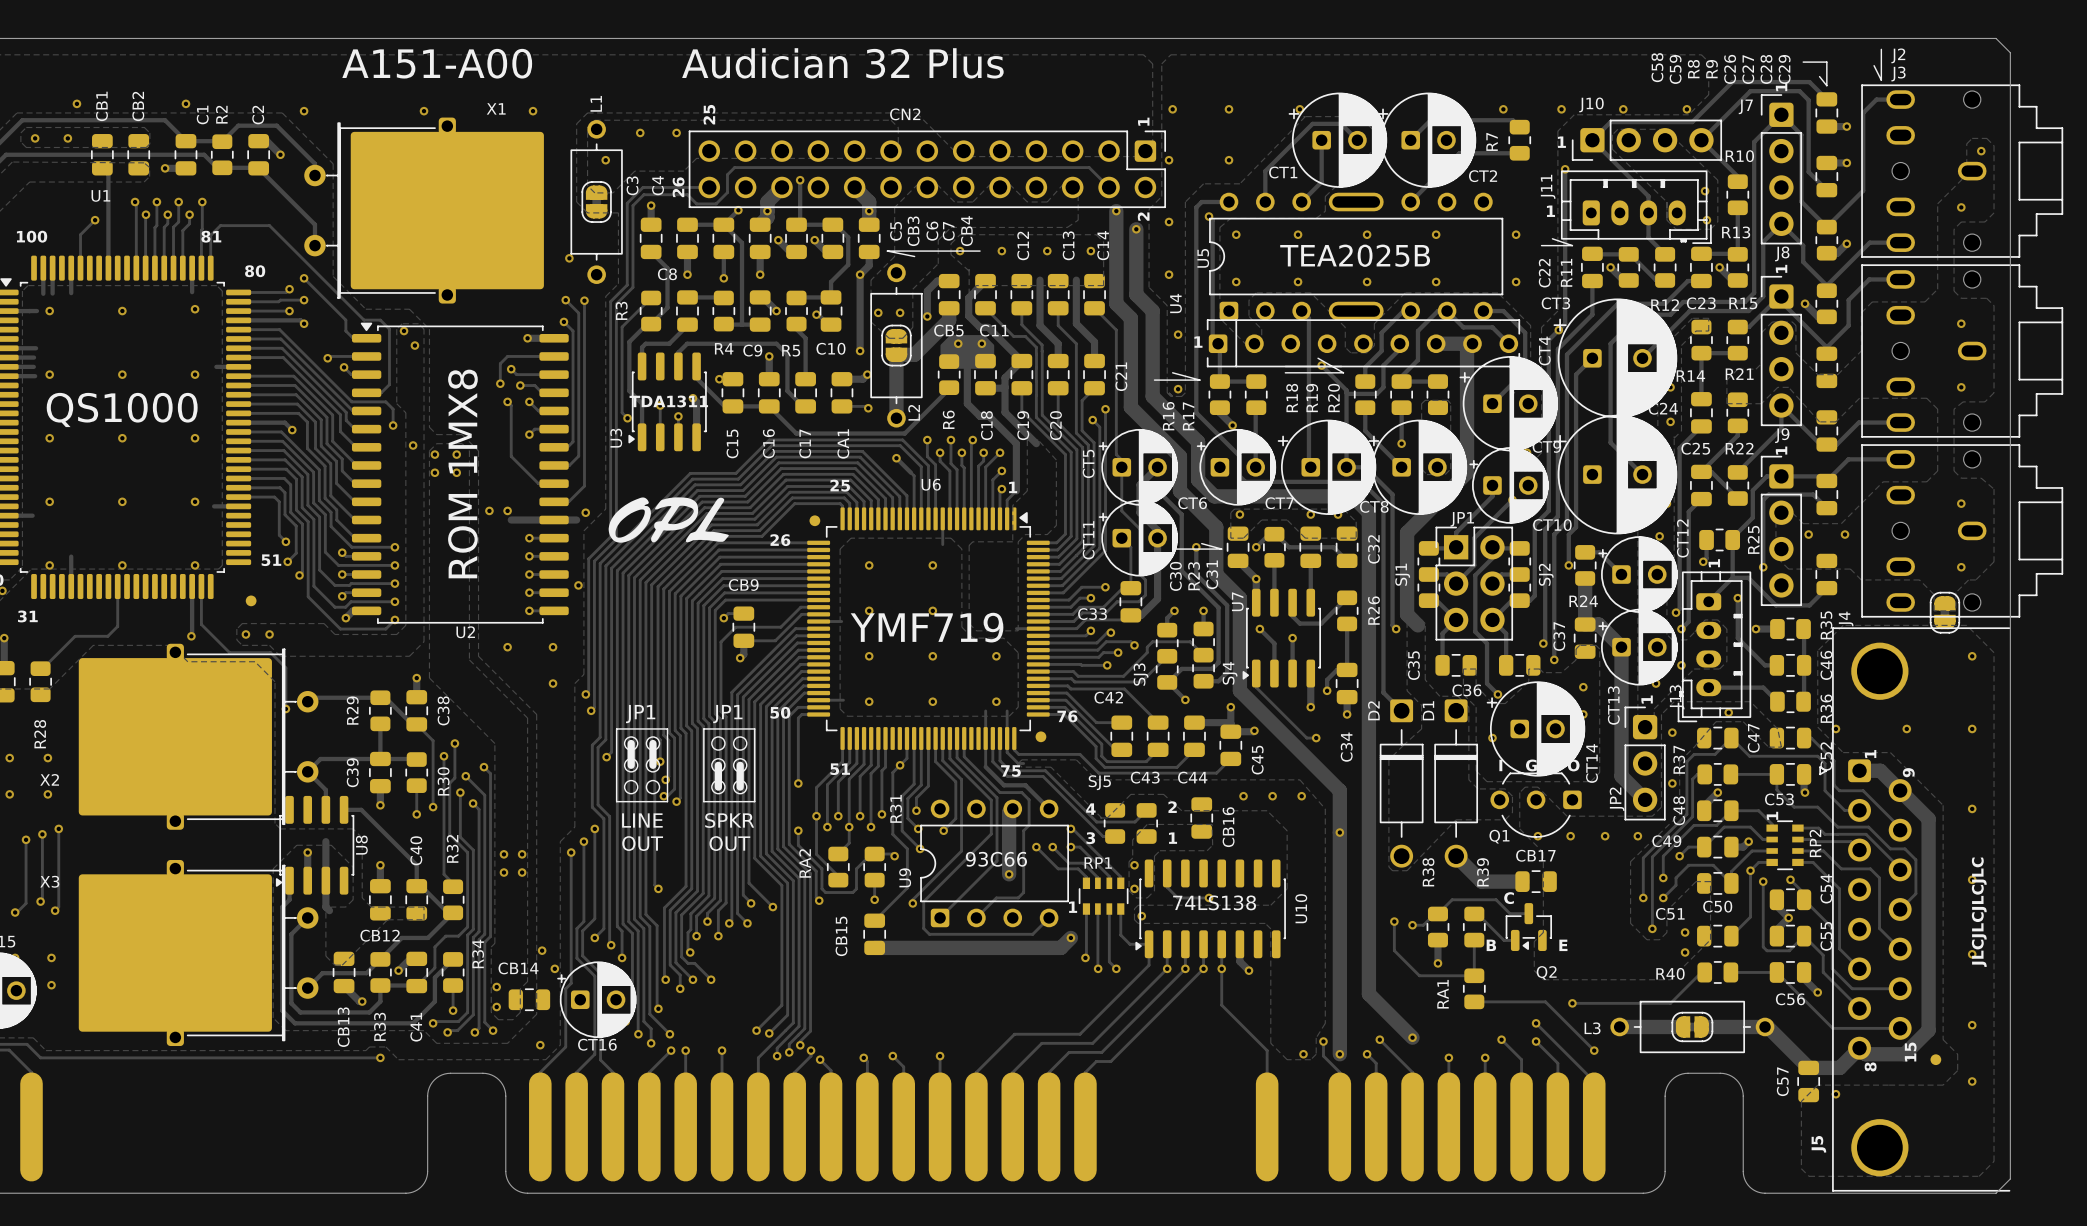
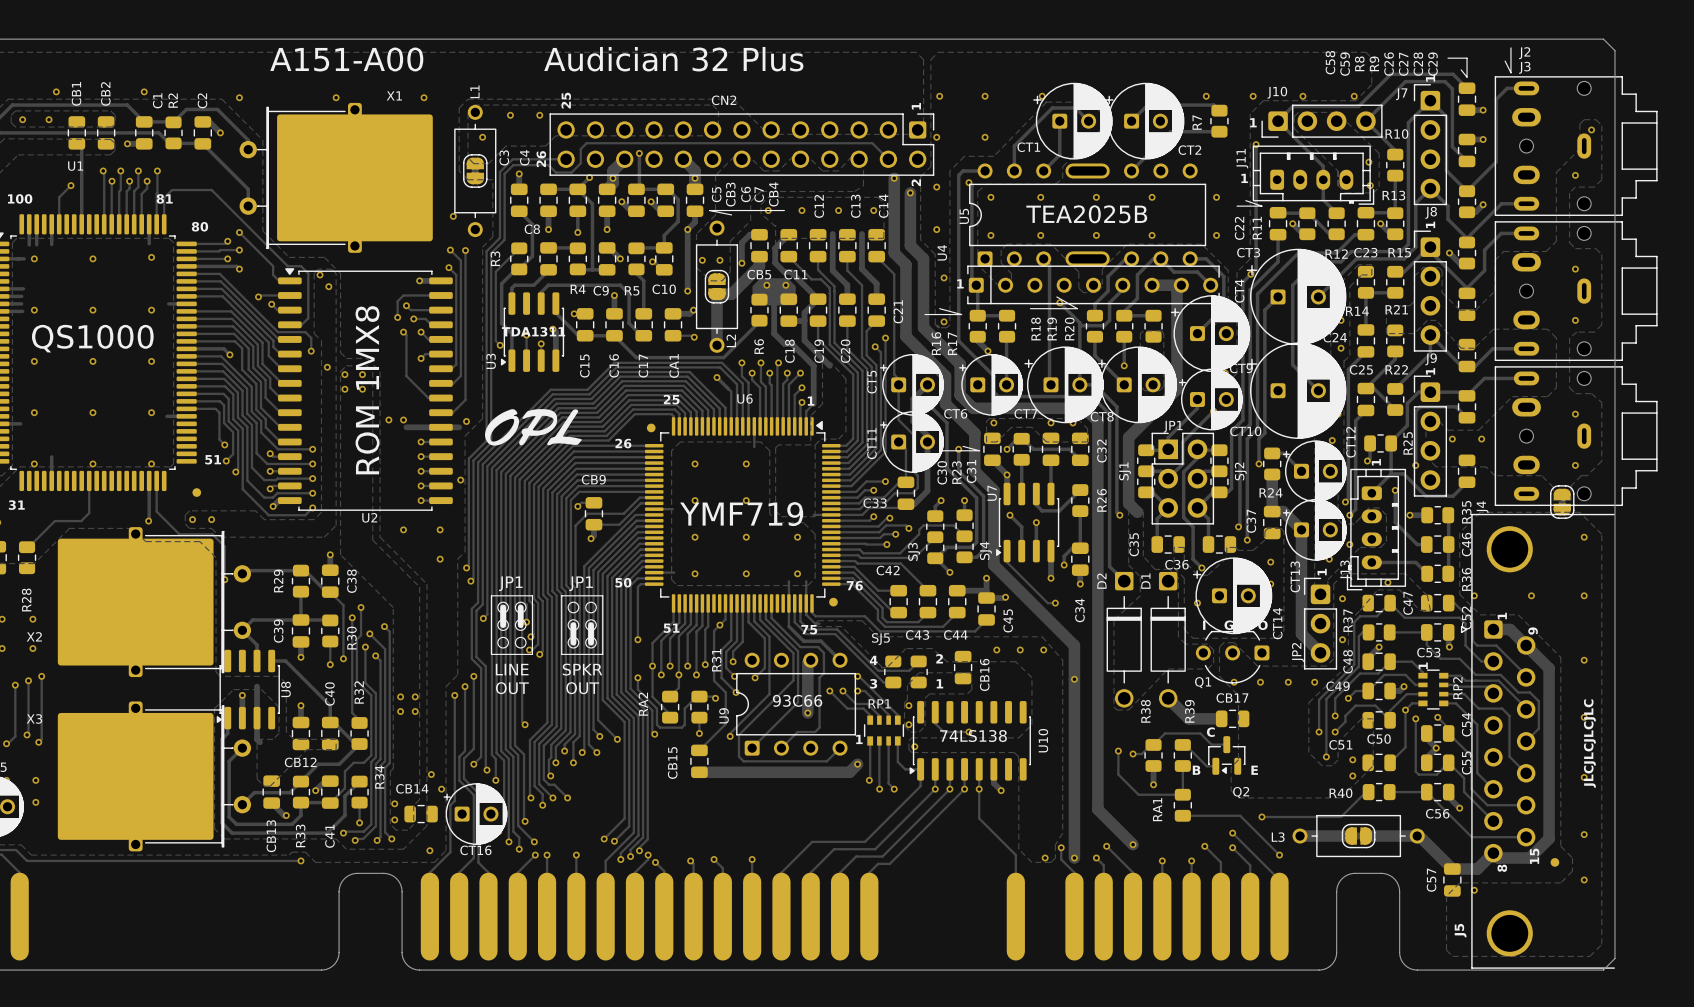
J2 footprint: [1861, 84, 2064, 258] -> [1494, 76, 1658, 216]
J3 footprint: [1861, 264, 2064, 438] -> [1494, 221, 1658, 362]
J4 footprint: [1861, 444, 2064, 618] -> [1494, 366, 1658, 507]

